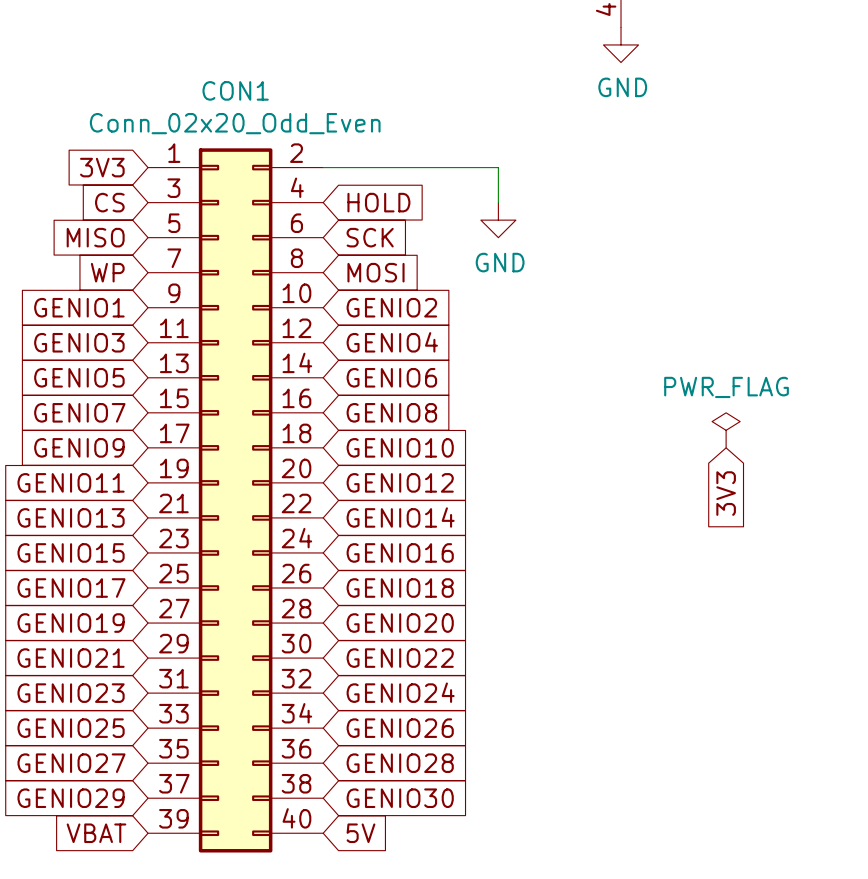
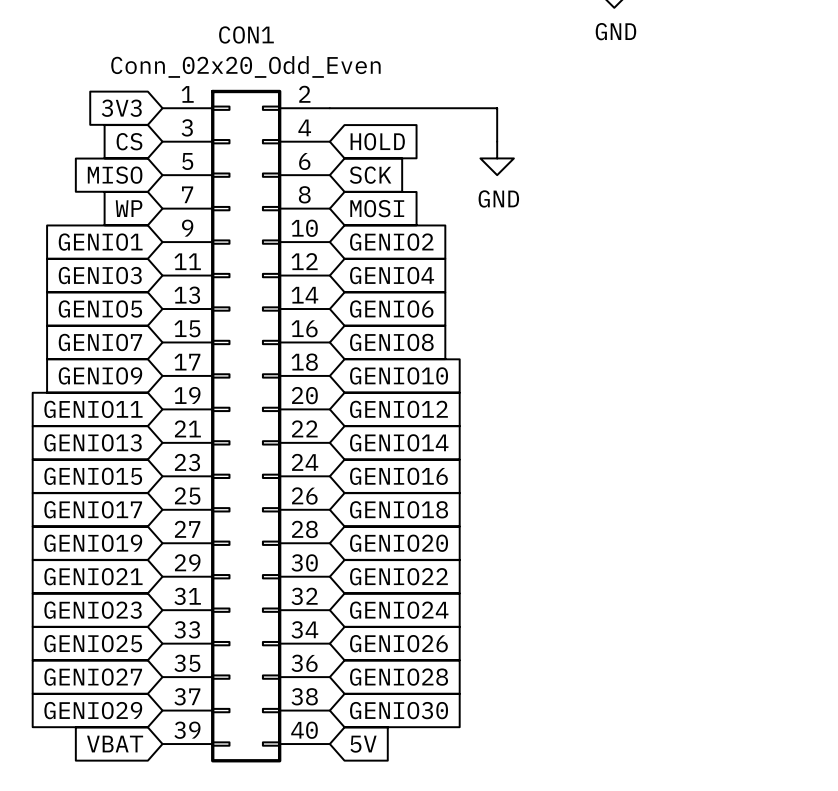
power symbol: PWR_FLAG (726, 430) -> none
global label: 3V3 (726, 493) -> none

